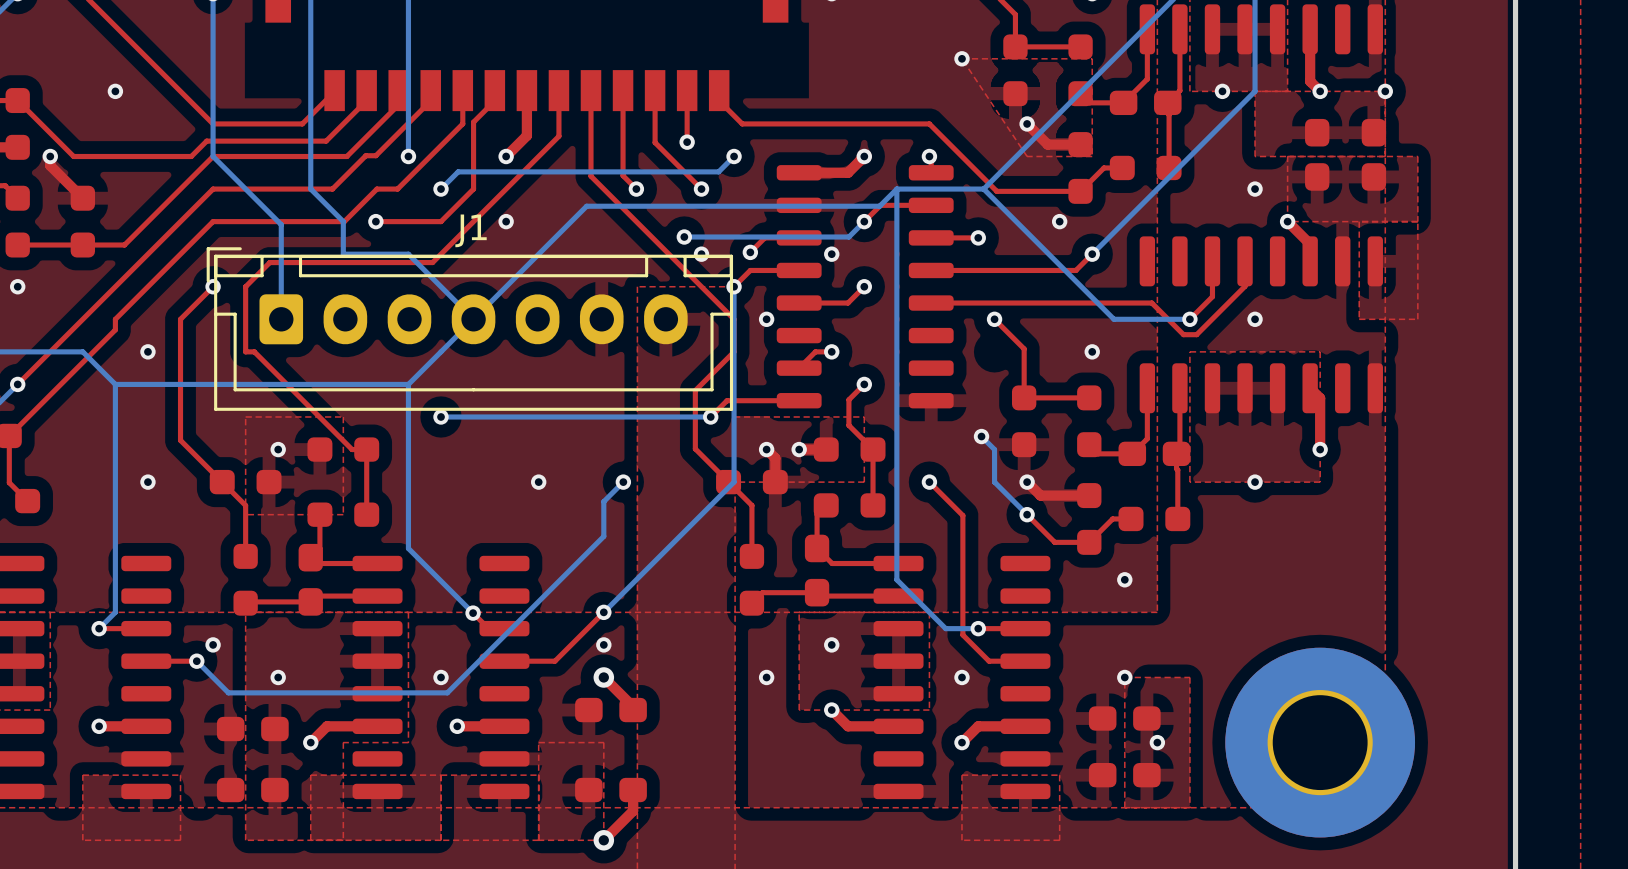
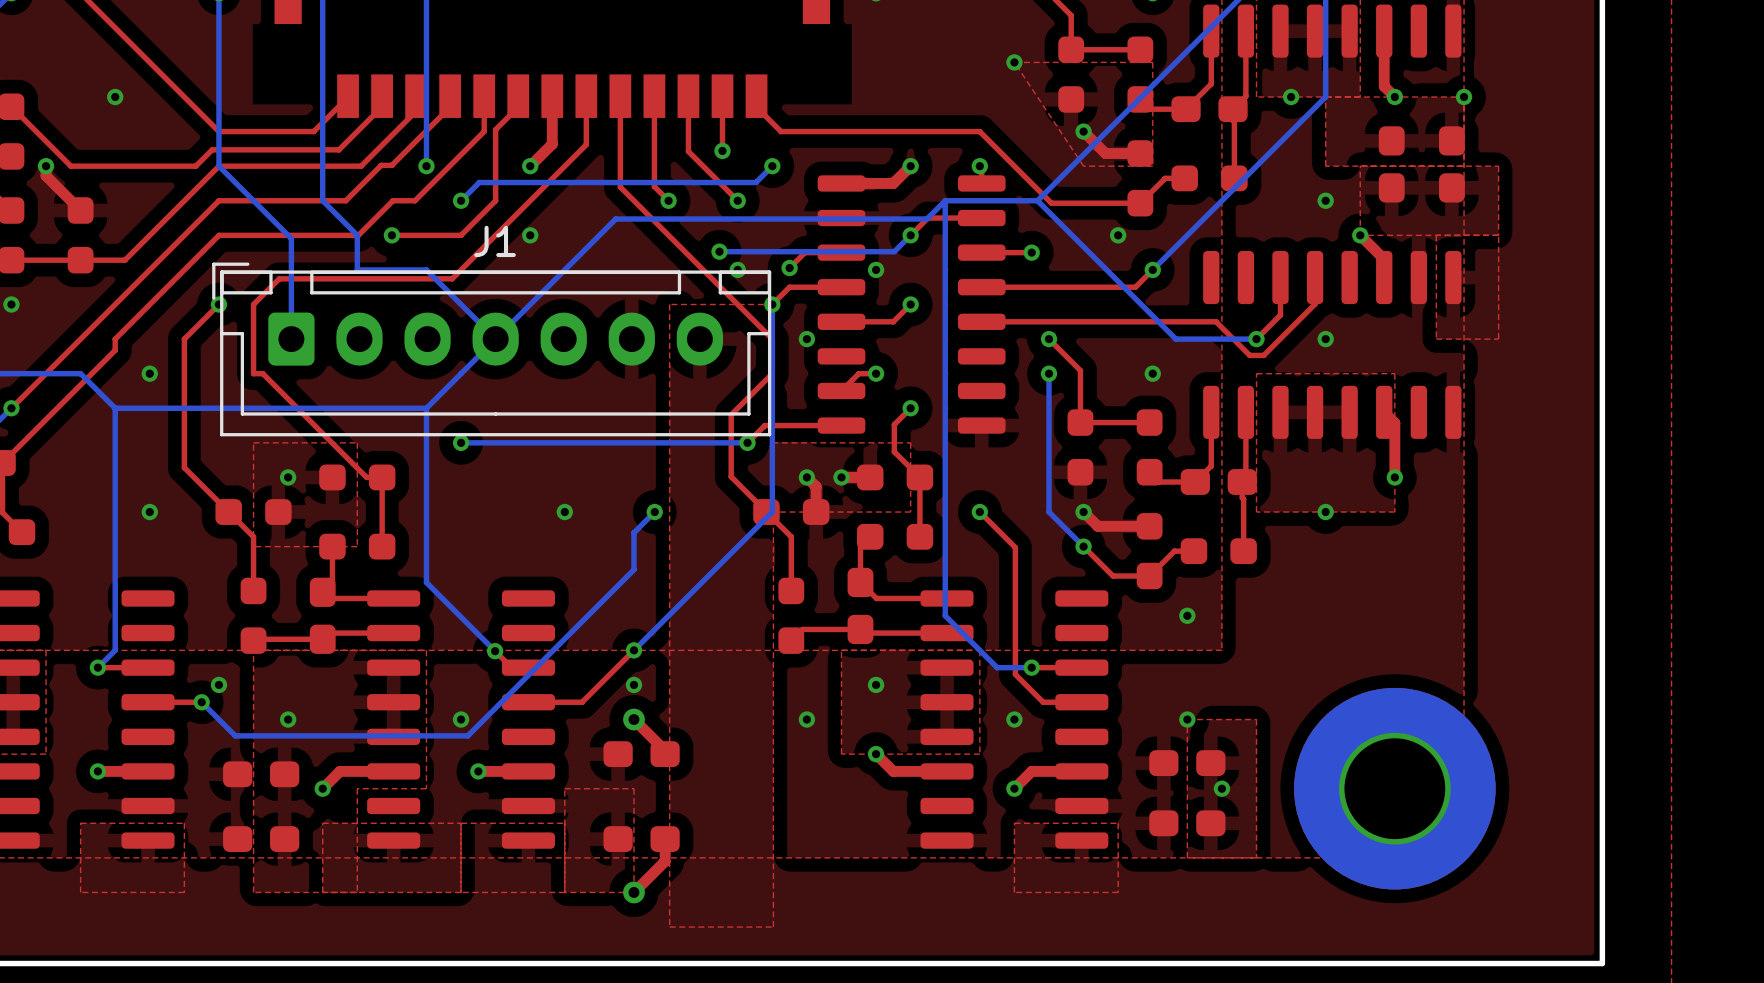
bottom track: (981, 436) (994, 449) -> (1049, 373) (1049, 477)
via position: (981, 436) -> (1049, 373)

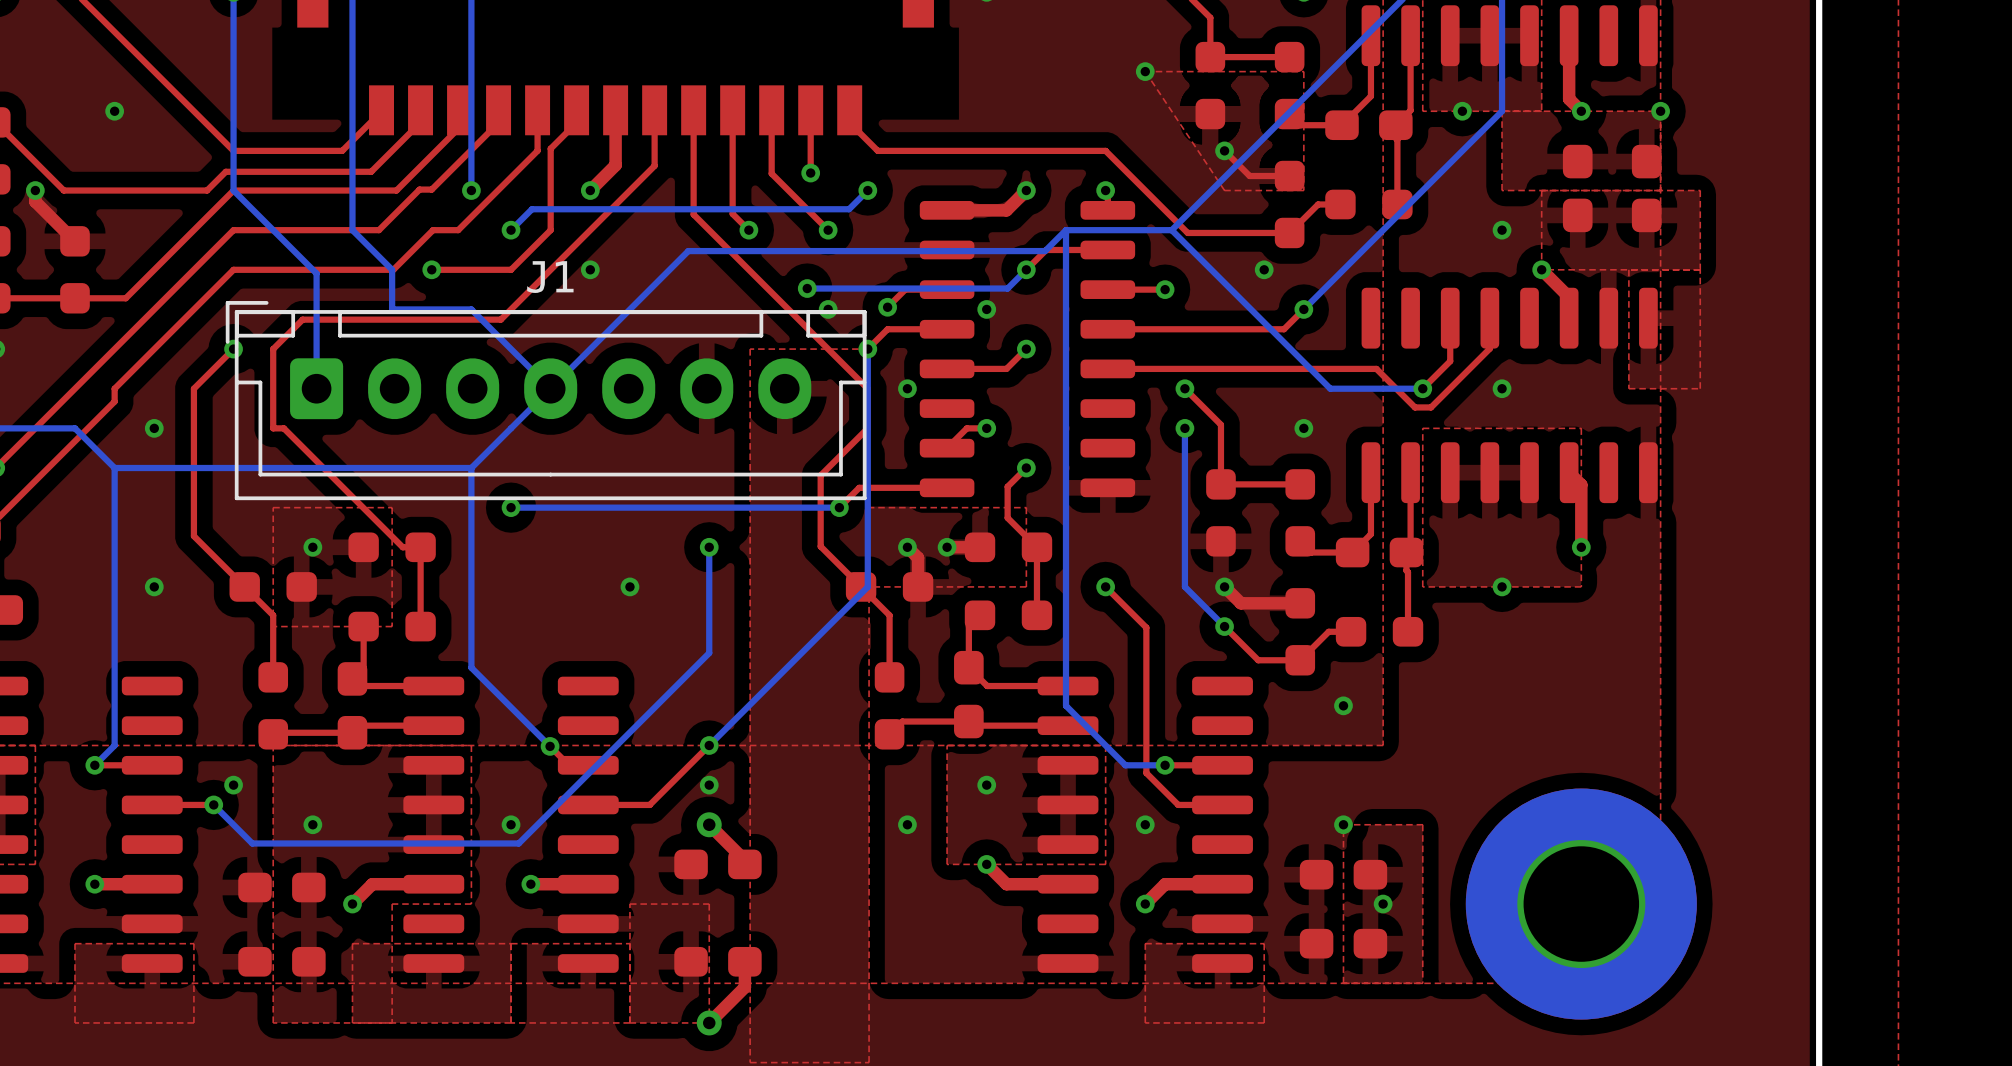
top track width: thick (1083, 131) (1105, 153) (1140, 153) -> thin (1224, 150) (1249, 176) (1289, 176)
bottom track: (654, 512) (633, 532) -> (709, 547) (709, 610)
via position: (654, 512) -> (709, 547)

